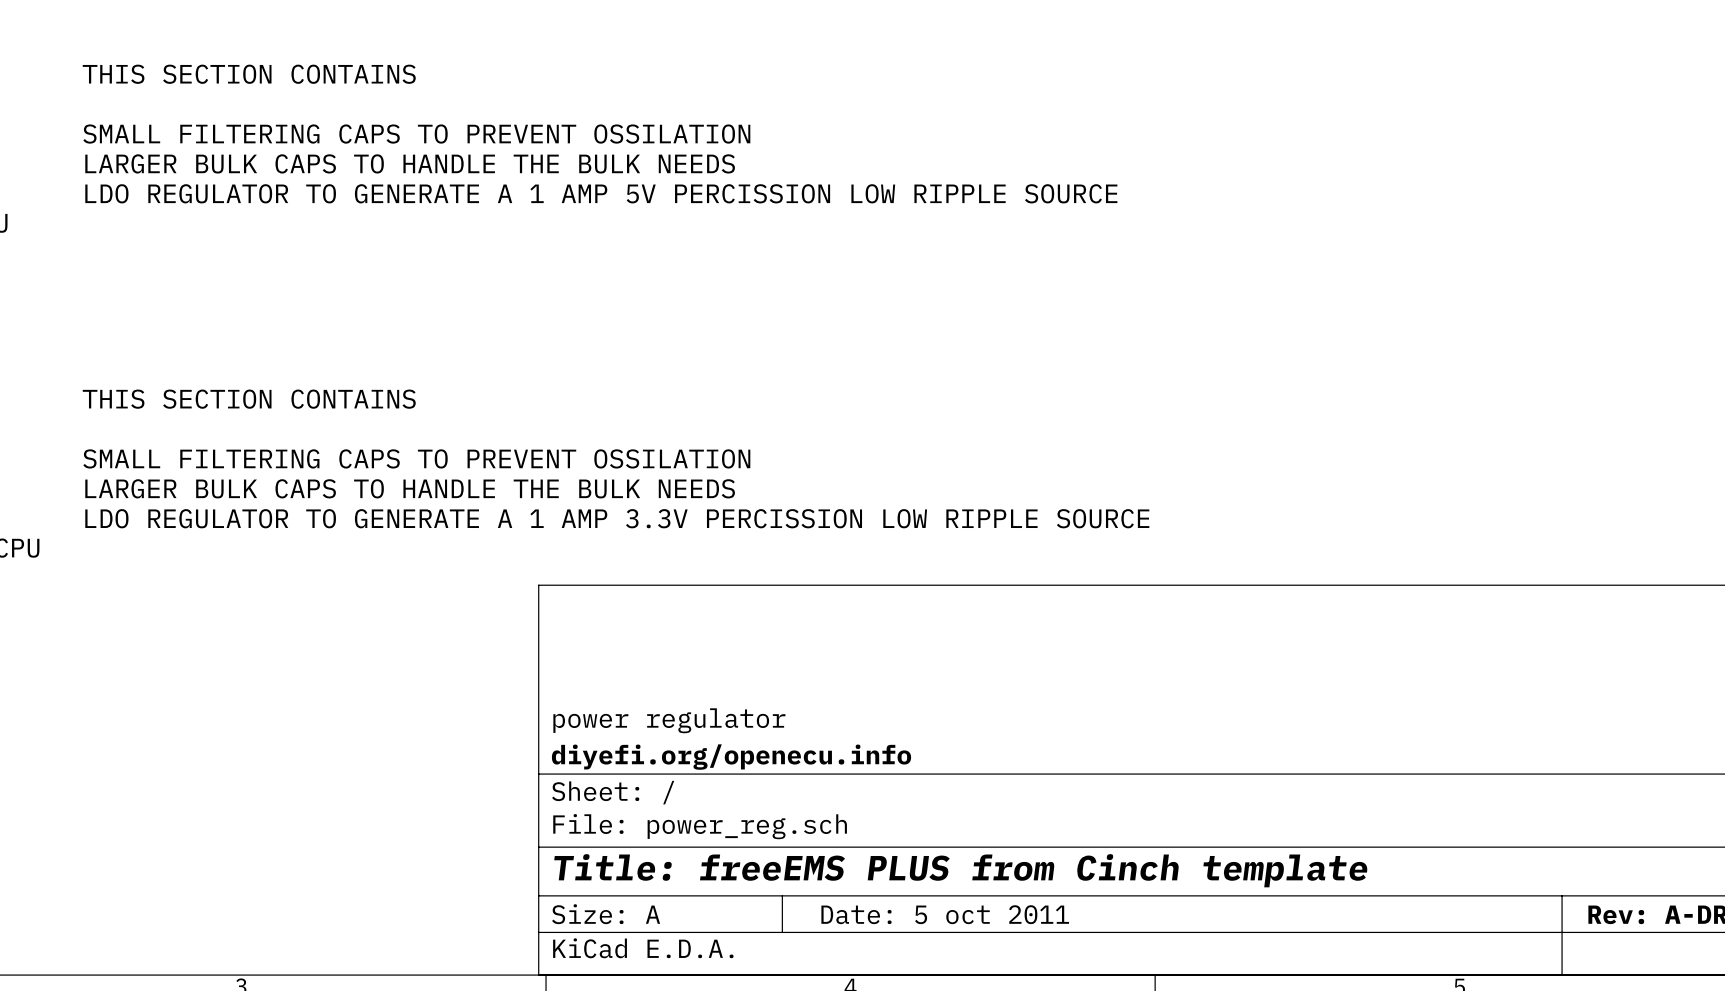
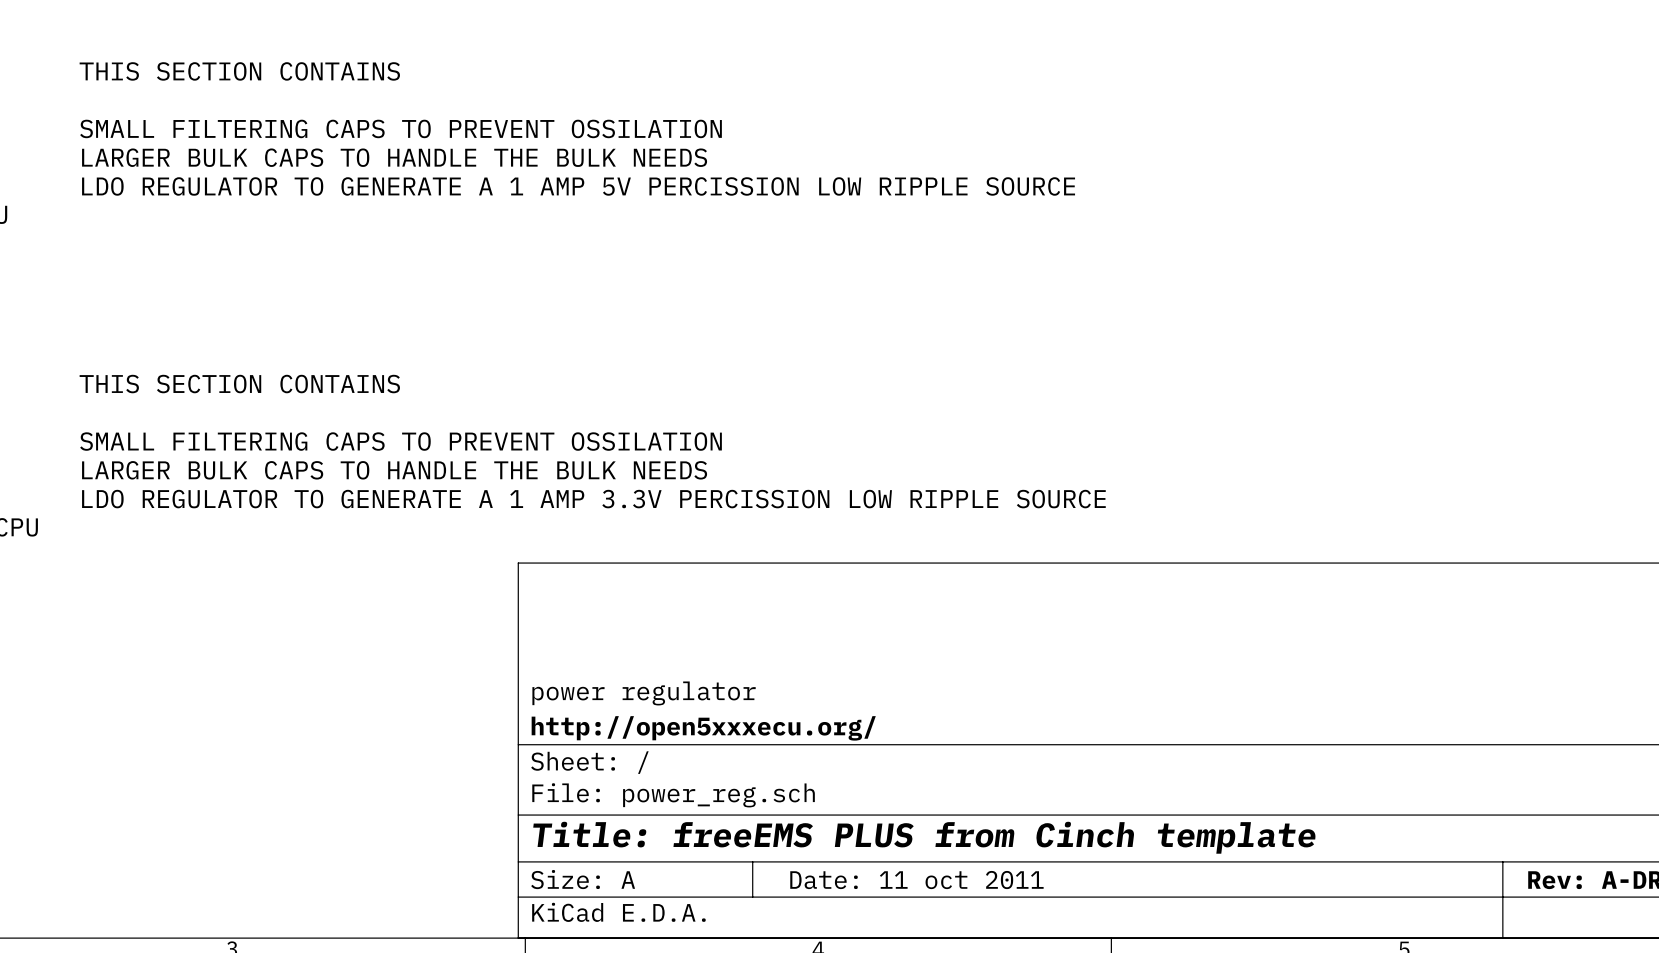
title block: diyefi.org/openecu.info (731, 757) -> http://open5xxxecu.org/ (703, 728)
title block: Date: 5 oct 2011 (945, 914) -> Date: 11 oct 2011 (916, 880)

